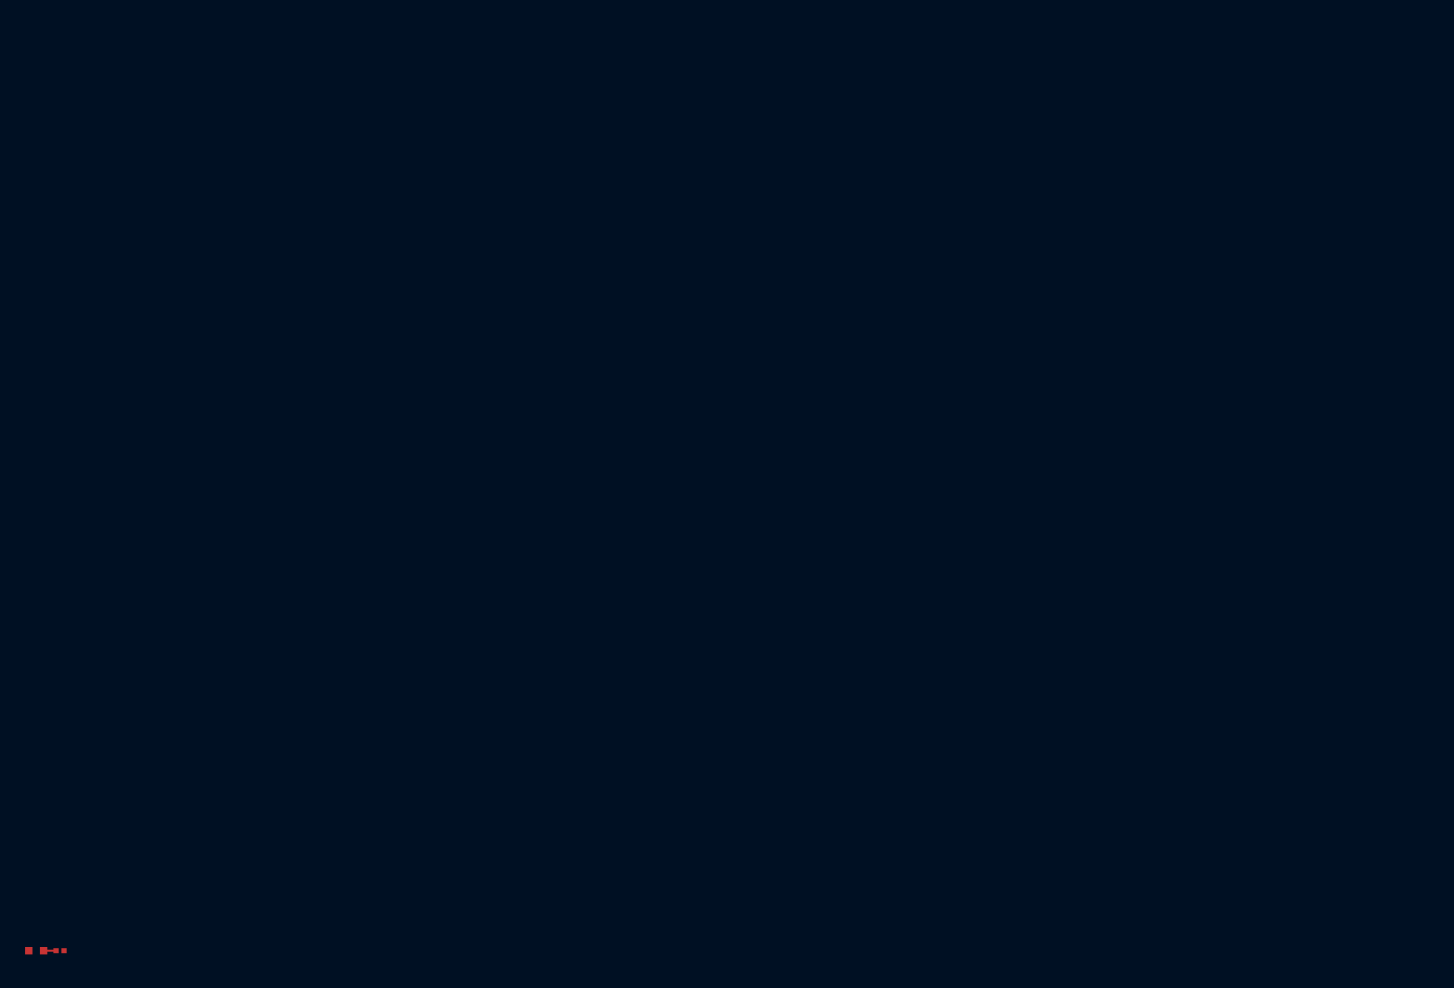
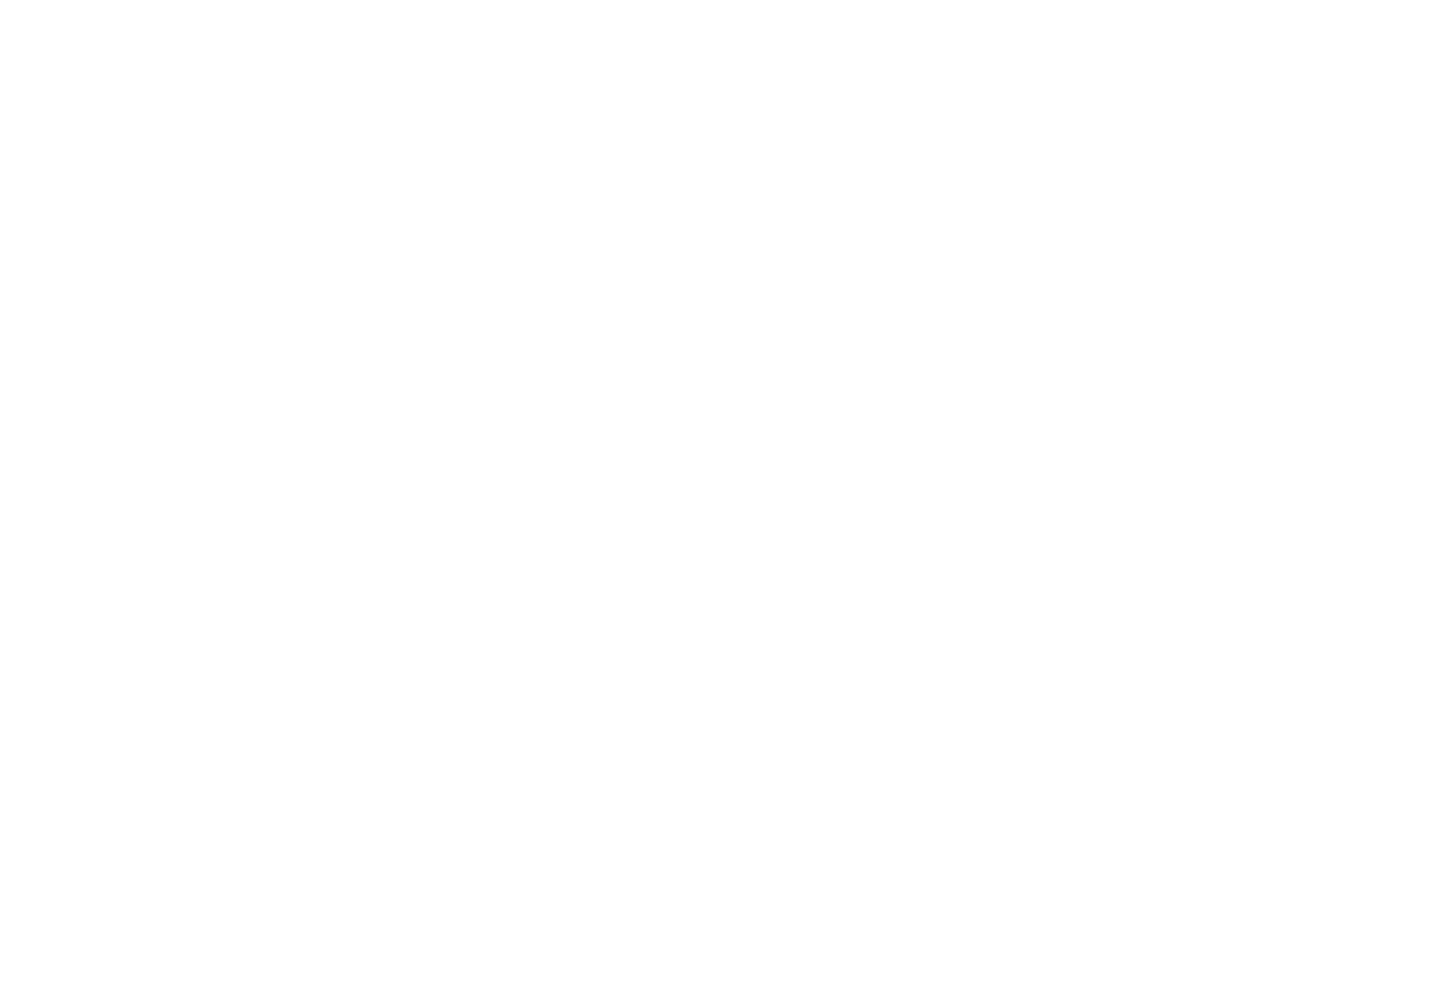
part: (36, 950) -> none
top track: (56, 950) (43, 950) -> none
part: (60, 950) -> none

